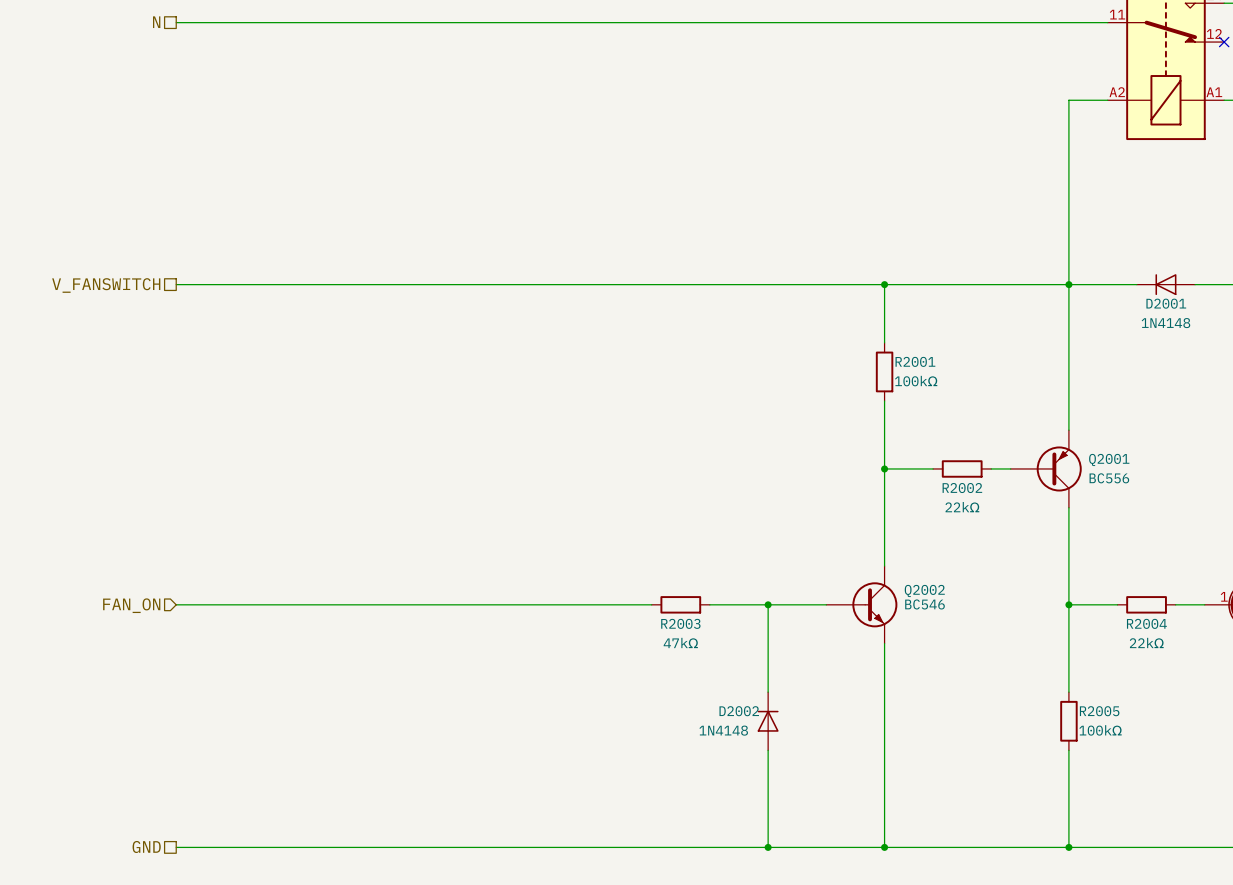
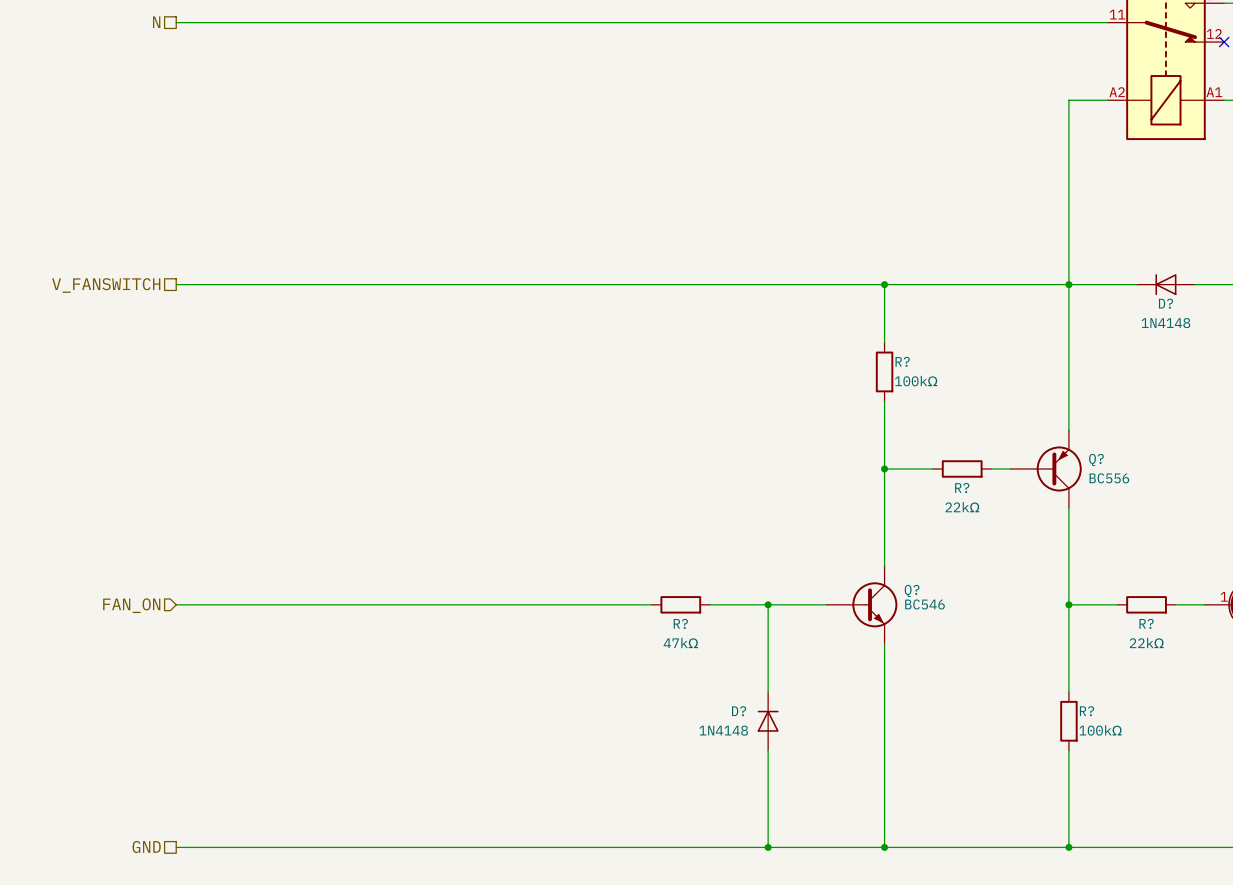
D2001 name: D2001 (1166, 303) -> D? (1166, 303)
R2001 name: R2001 (915, 361) -> R? (902, 361)
Q2001 name: Q2001 (1109, 459) -> Q? (1096, 459)
R2002 name: R2002 (962, 488) -> R? (962, 488)
Q2002 name: Q2002 (924, 590) -> Q? (912, 590)
R2003 name: R2003 (680, 623) -> R? (680, 623)
R2004 name: R2004 (1146, 623) -> R? (1146, 623)
D2002 name: D2002 (739, 711) -> D? (739, 711)
R2005 name: R2005 (1099, 711) -> R? (1086, 711)

